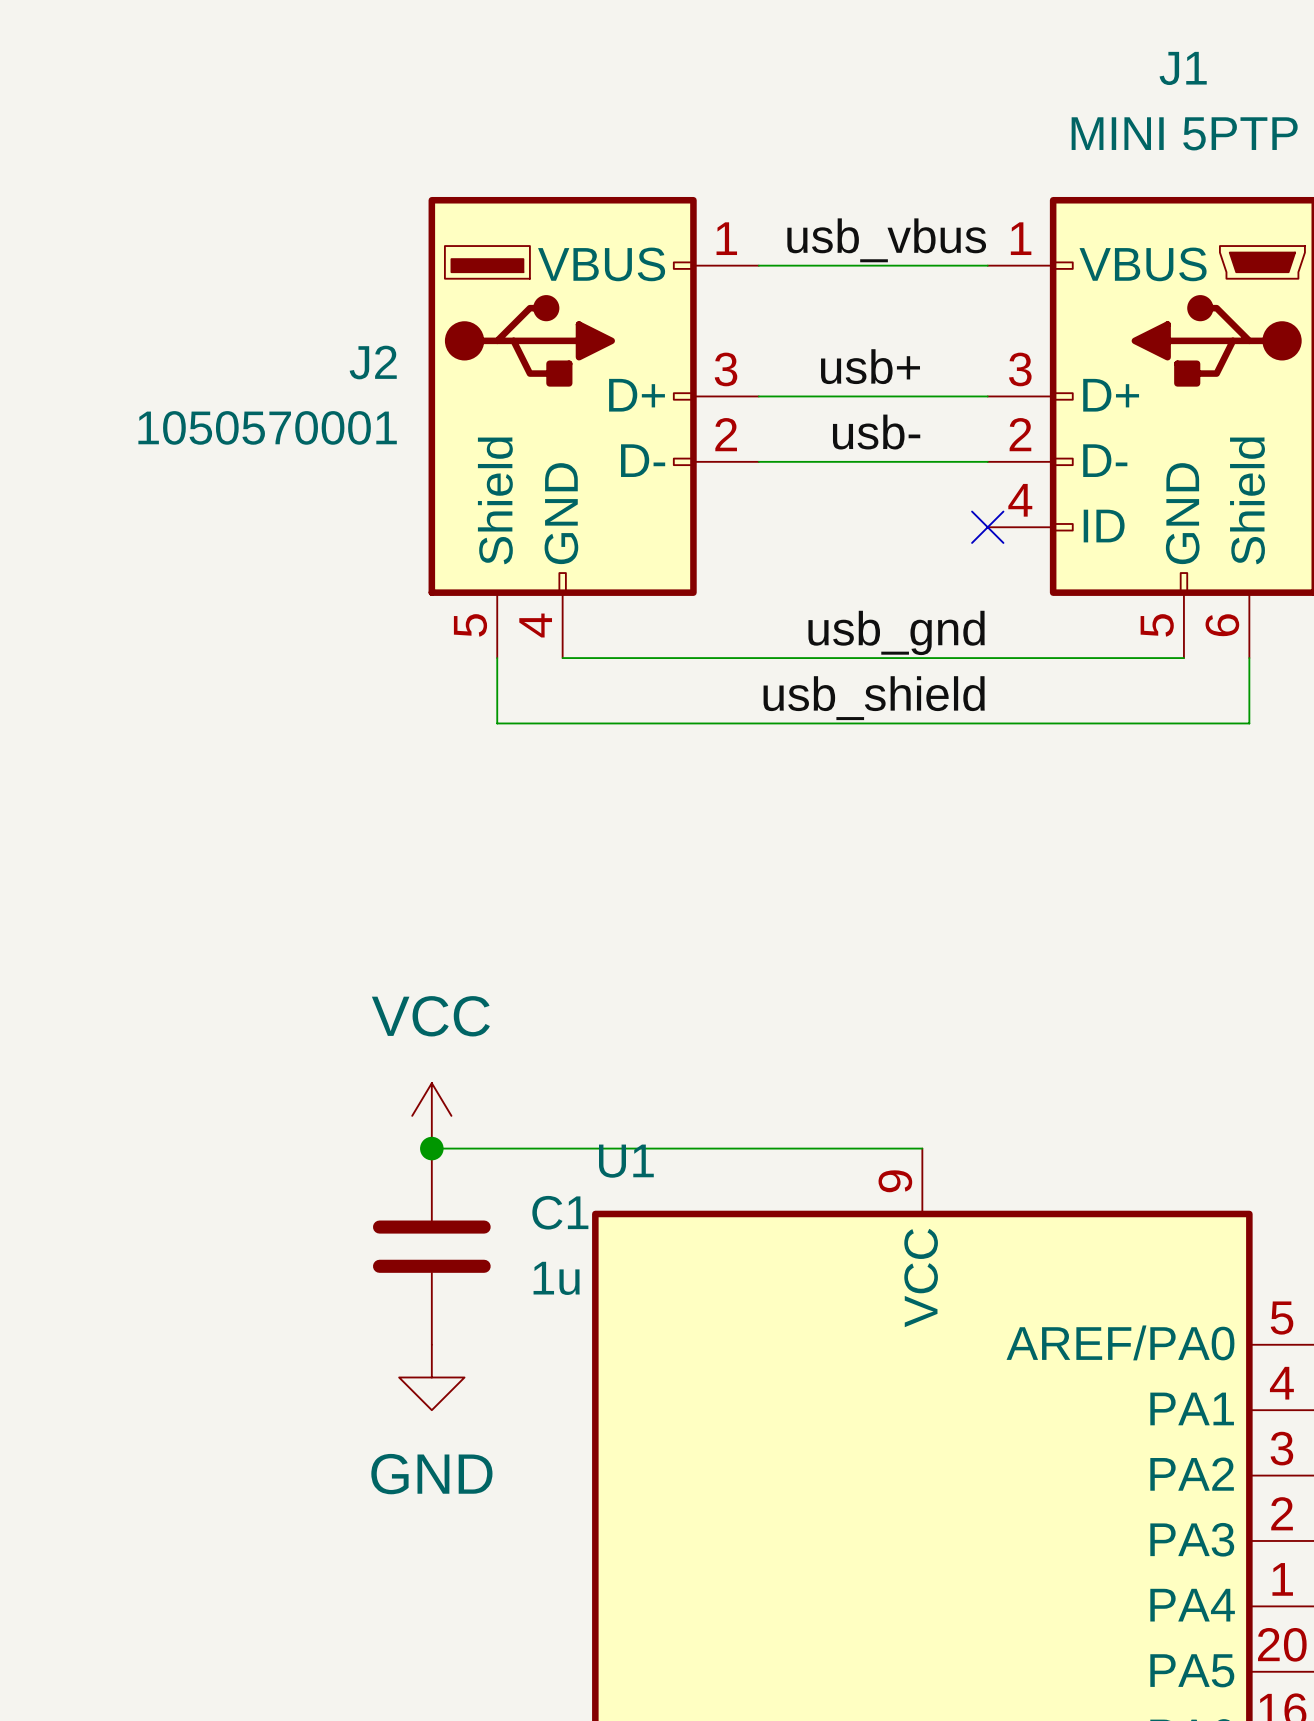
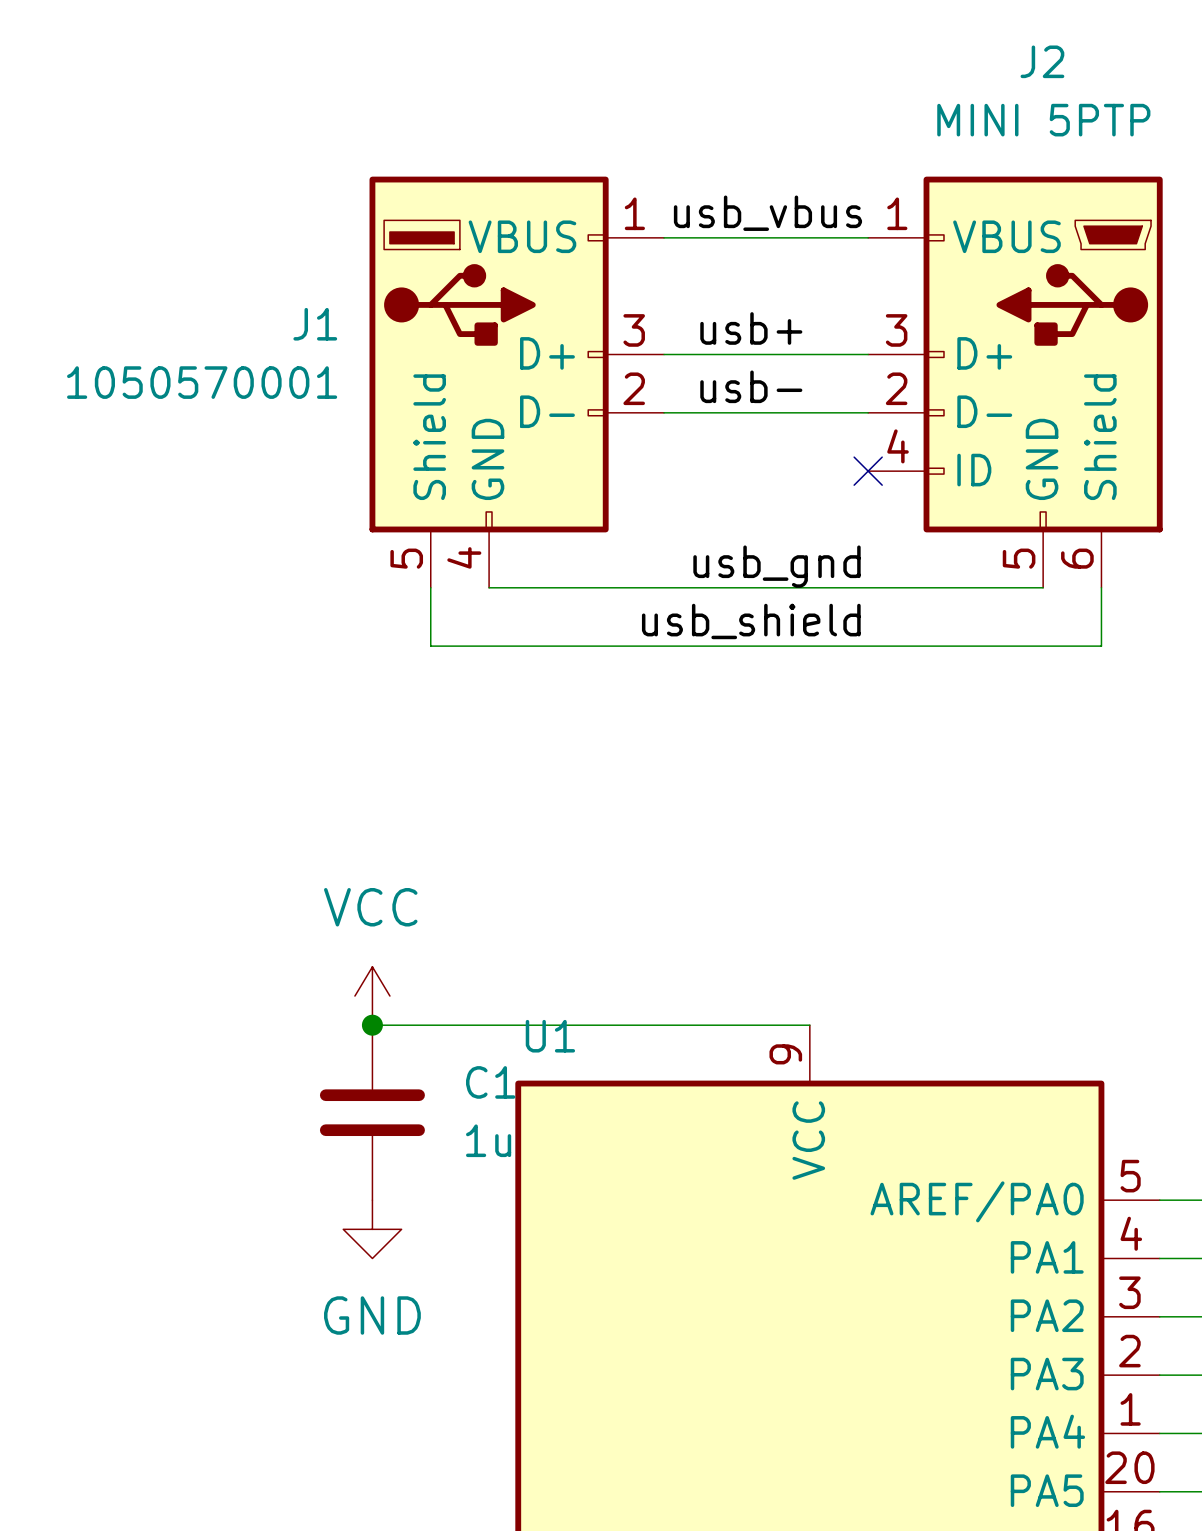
J1 name: J1 (1183, 68) -> J2 (1042, 61)
J2 name: J2 (373, 362) -> J1 (315, 324)

